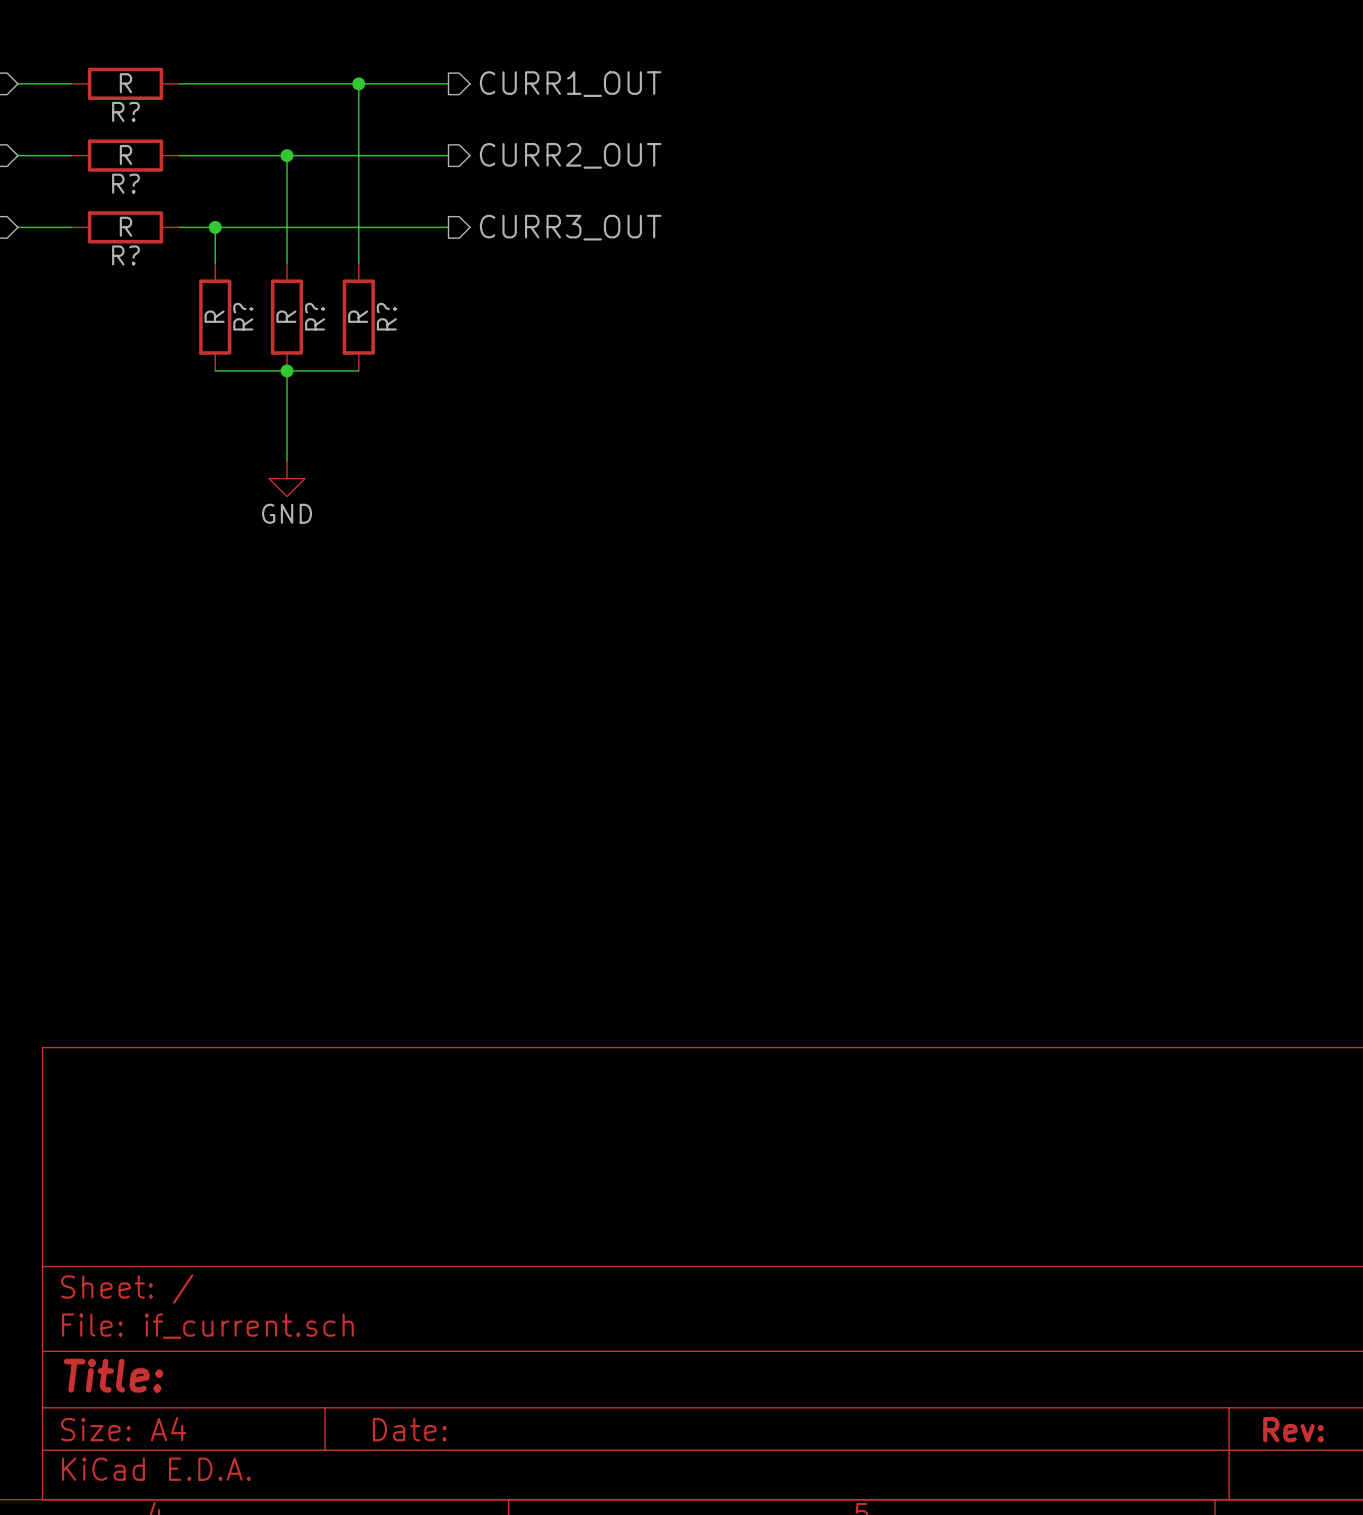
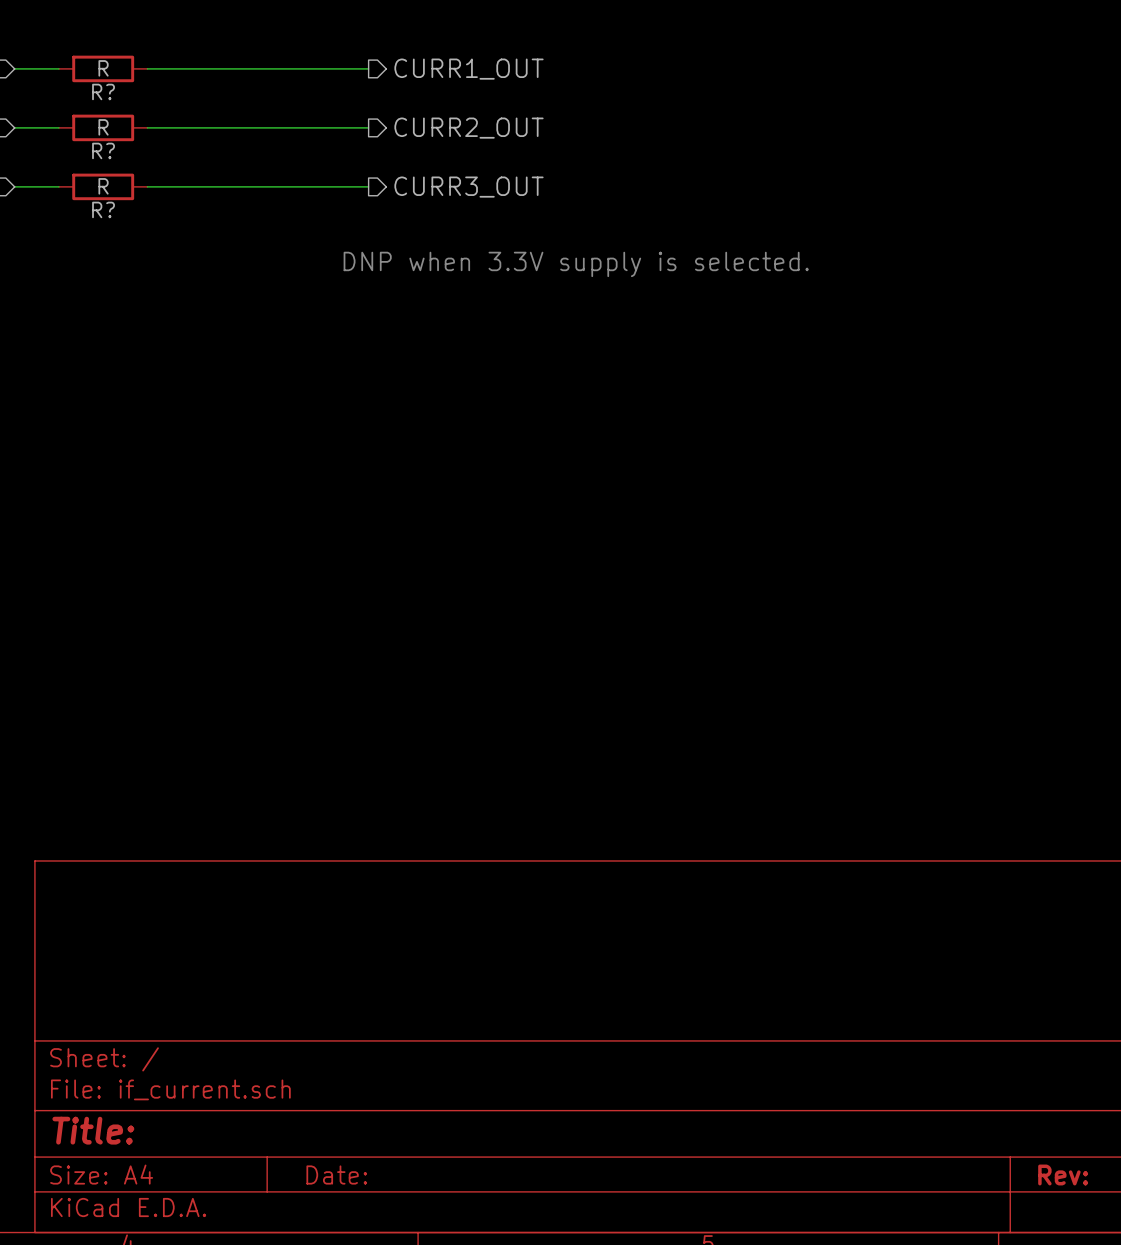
wire: (358, 83) (358, 263) -> none
junction: (358, 83) -> none
wire: (287, 155) (287, 263) -> none
junction: (287, 155) -> none
wire: (215, 227) (215, 263) -> none
junction: (215, 227) -> none
R?: R (215, 317) -> none
R?: R (287, 317) -> none
R?: R (358, 317) -> none
text: none -> DNP when 3.3V supply is selected. (576, 264)
wire: (215, 370) (358, 370) -> none
wire: (287, 370) (287, 460) -> none
junction: (287, 370) -> none
power symbol: GND (287, 478) -> none

